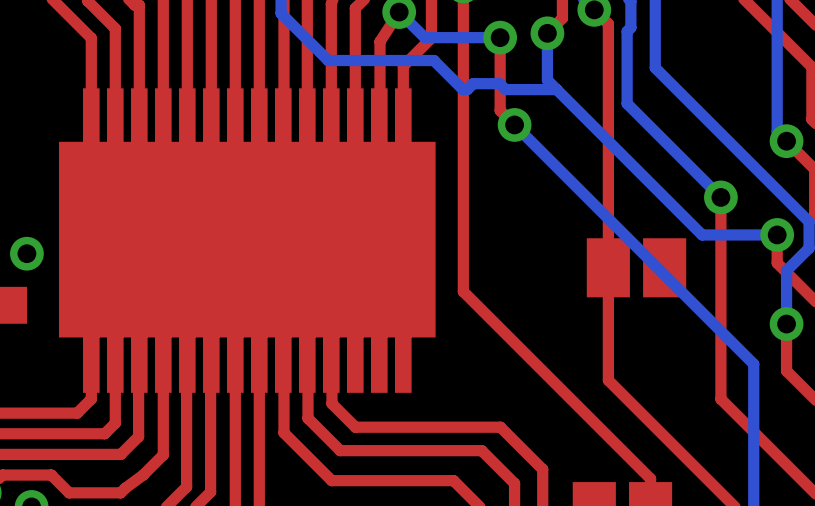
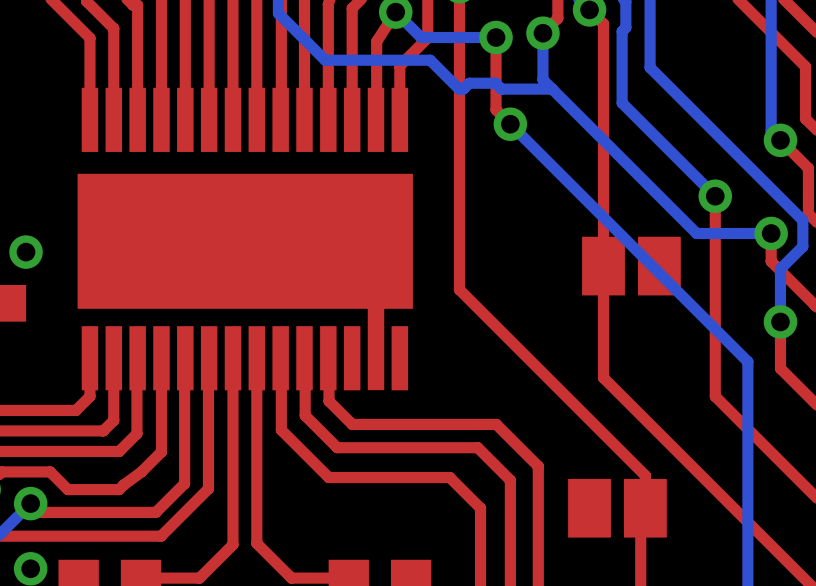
part footprint: [59, 88, 436, 393] -> [77, 87, 413, 391]

